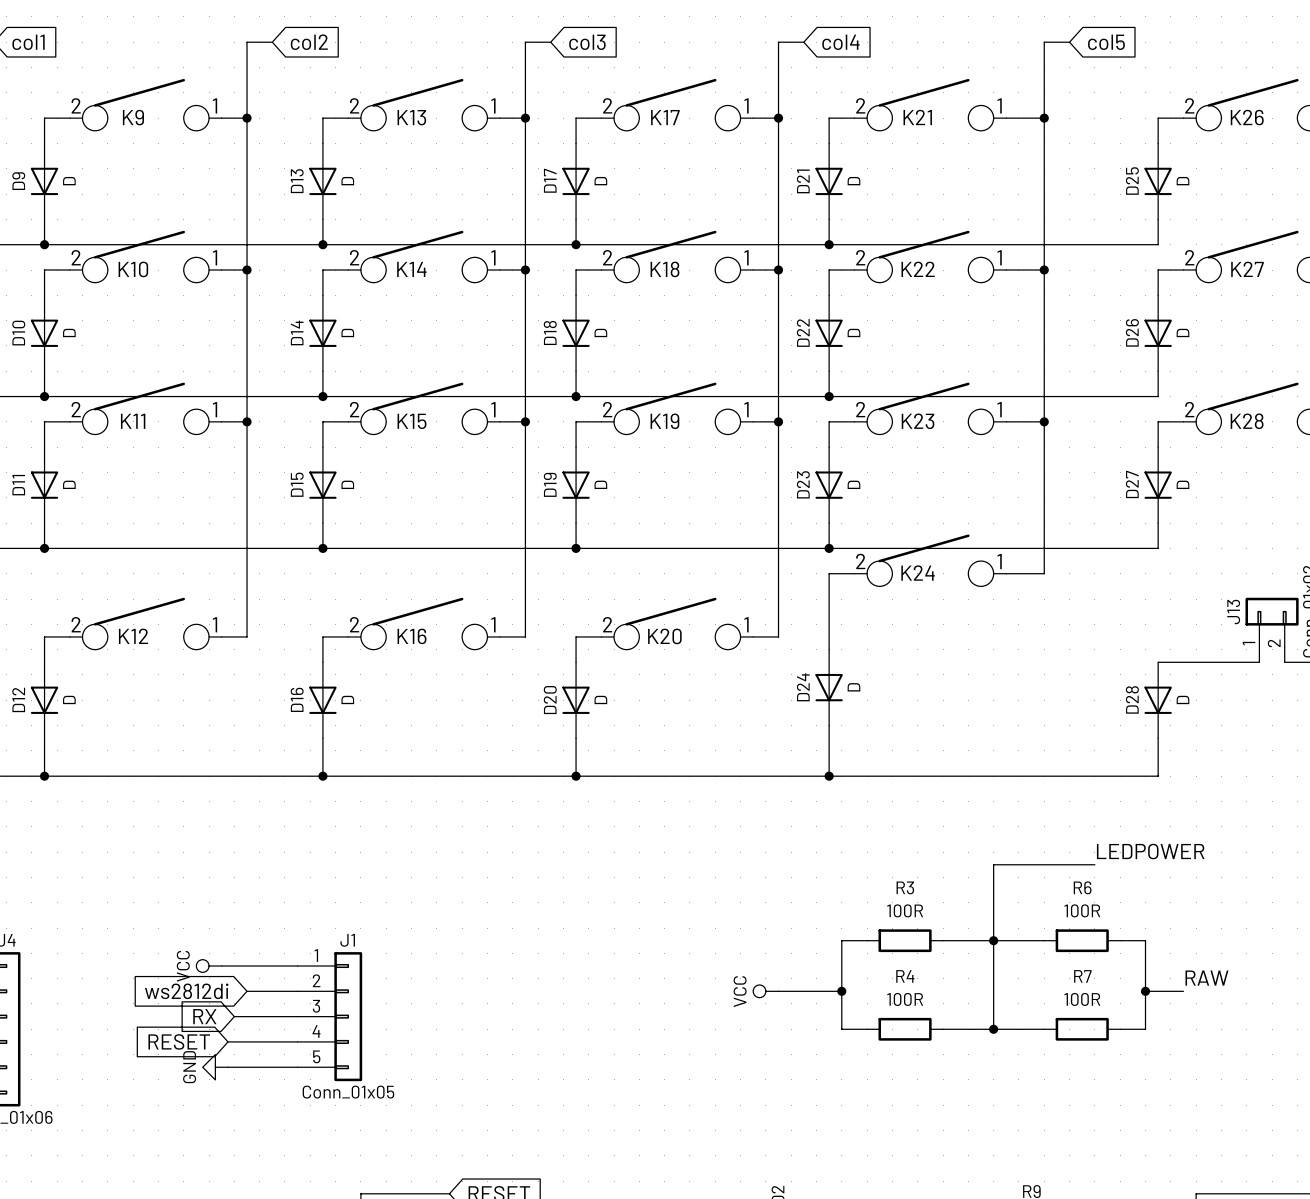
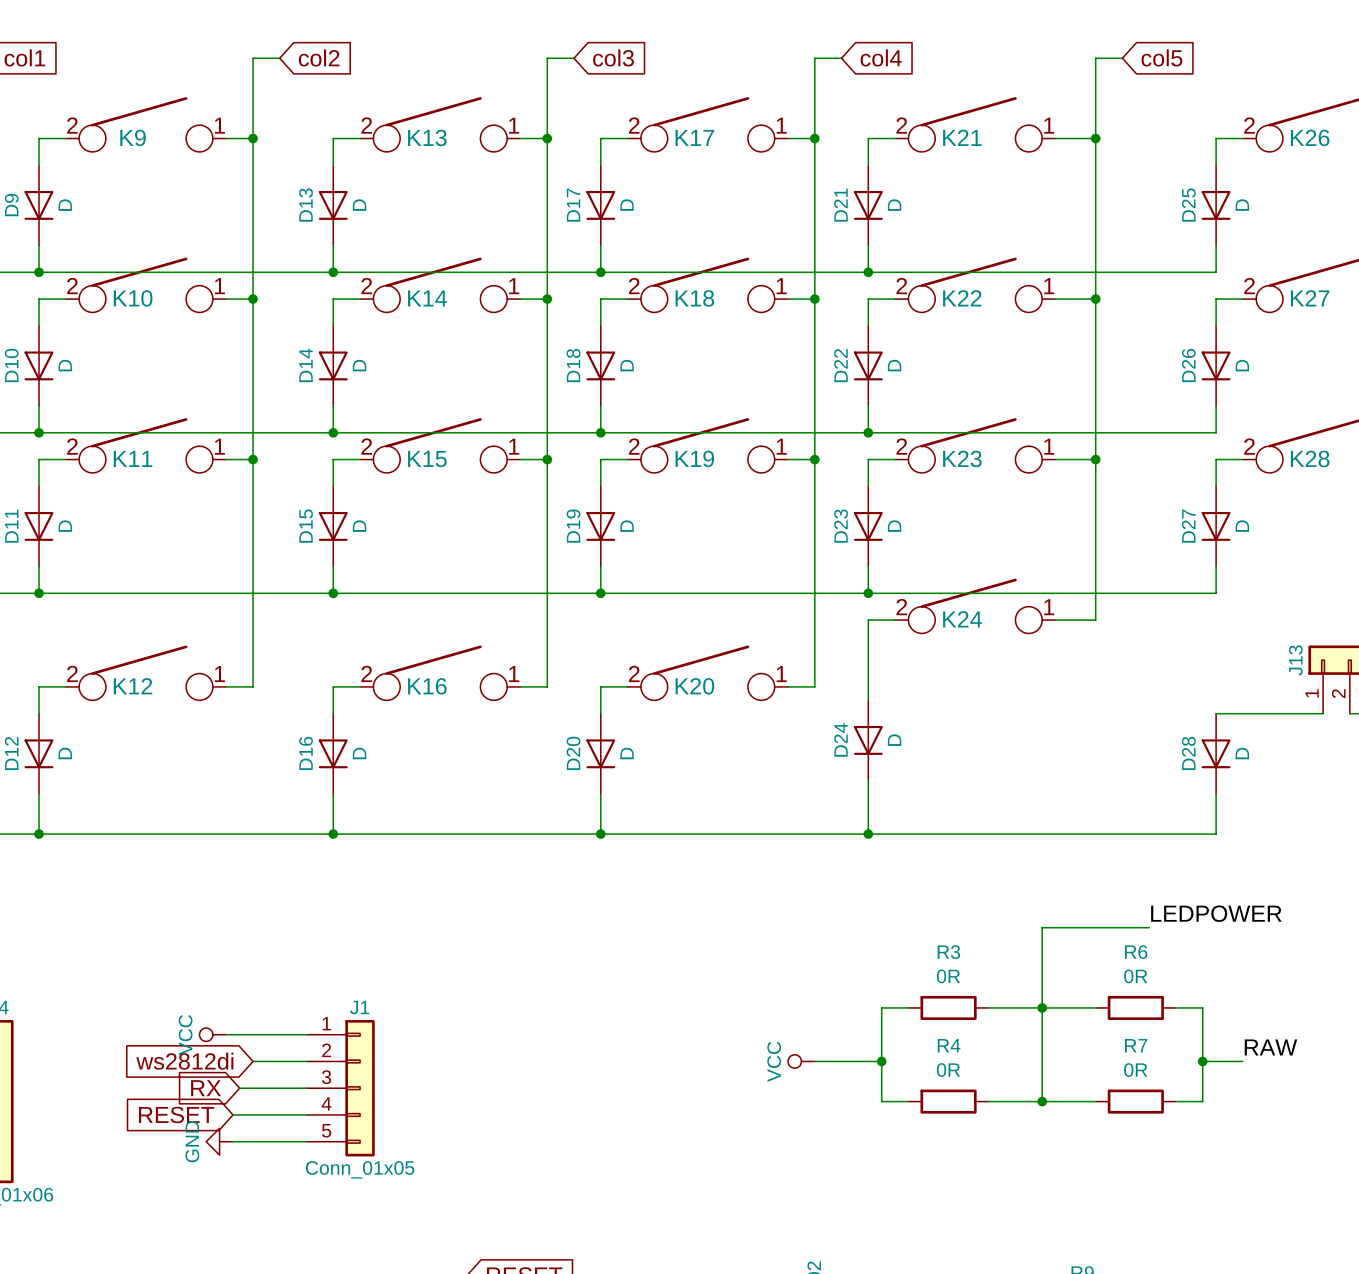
R3 value: 100R (905, 910) -> 0R (948, 976)
R6 value: 100R (1082, 910) -> 0R (1135, 976)
R4 value: 100R (905, 999) -> 0R (948, 1070)
R7 value: 100R (1082, 999) -> 0R (1135, 1070)

